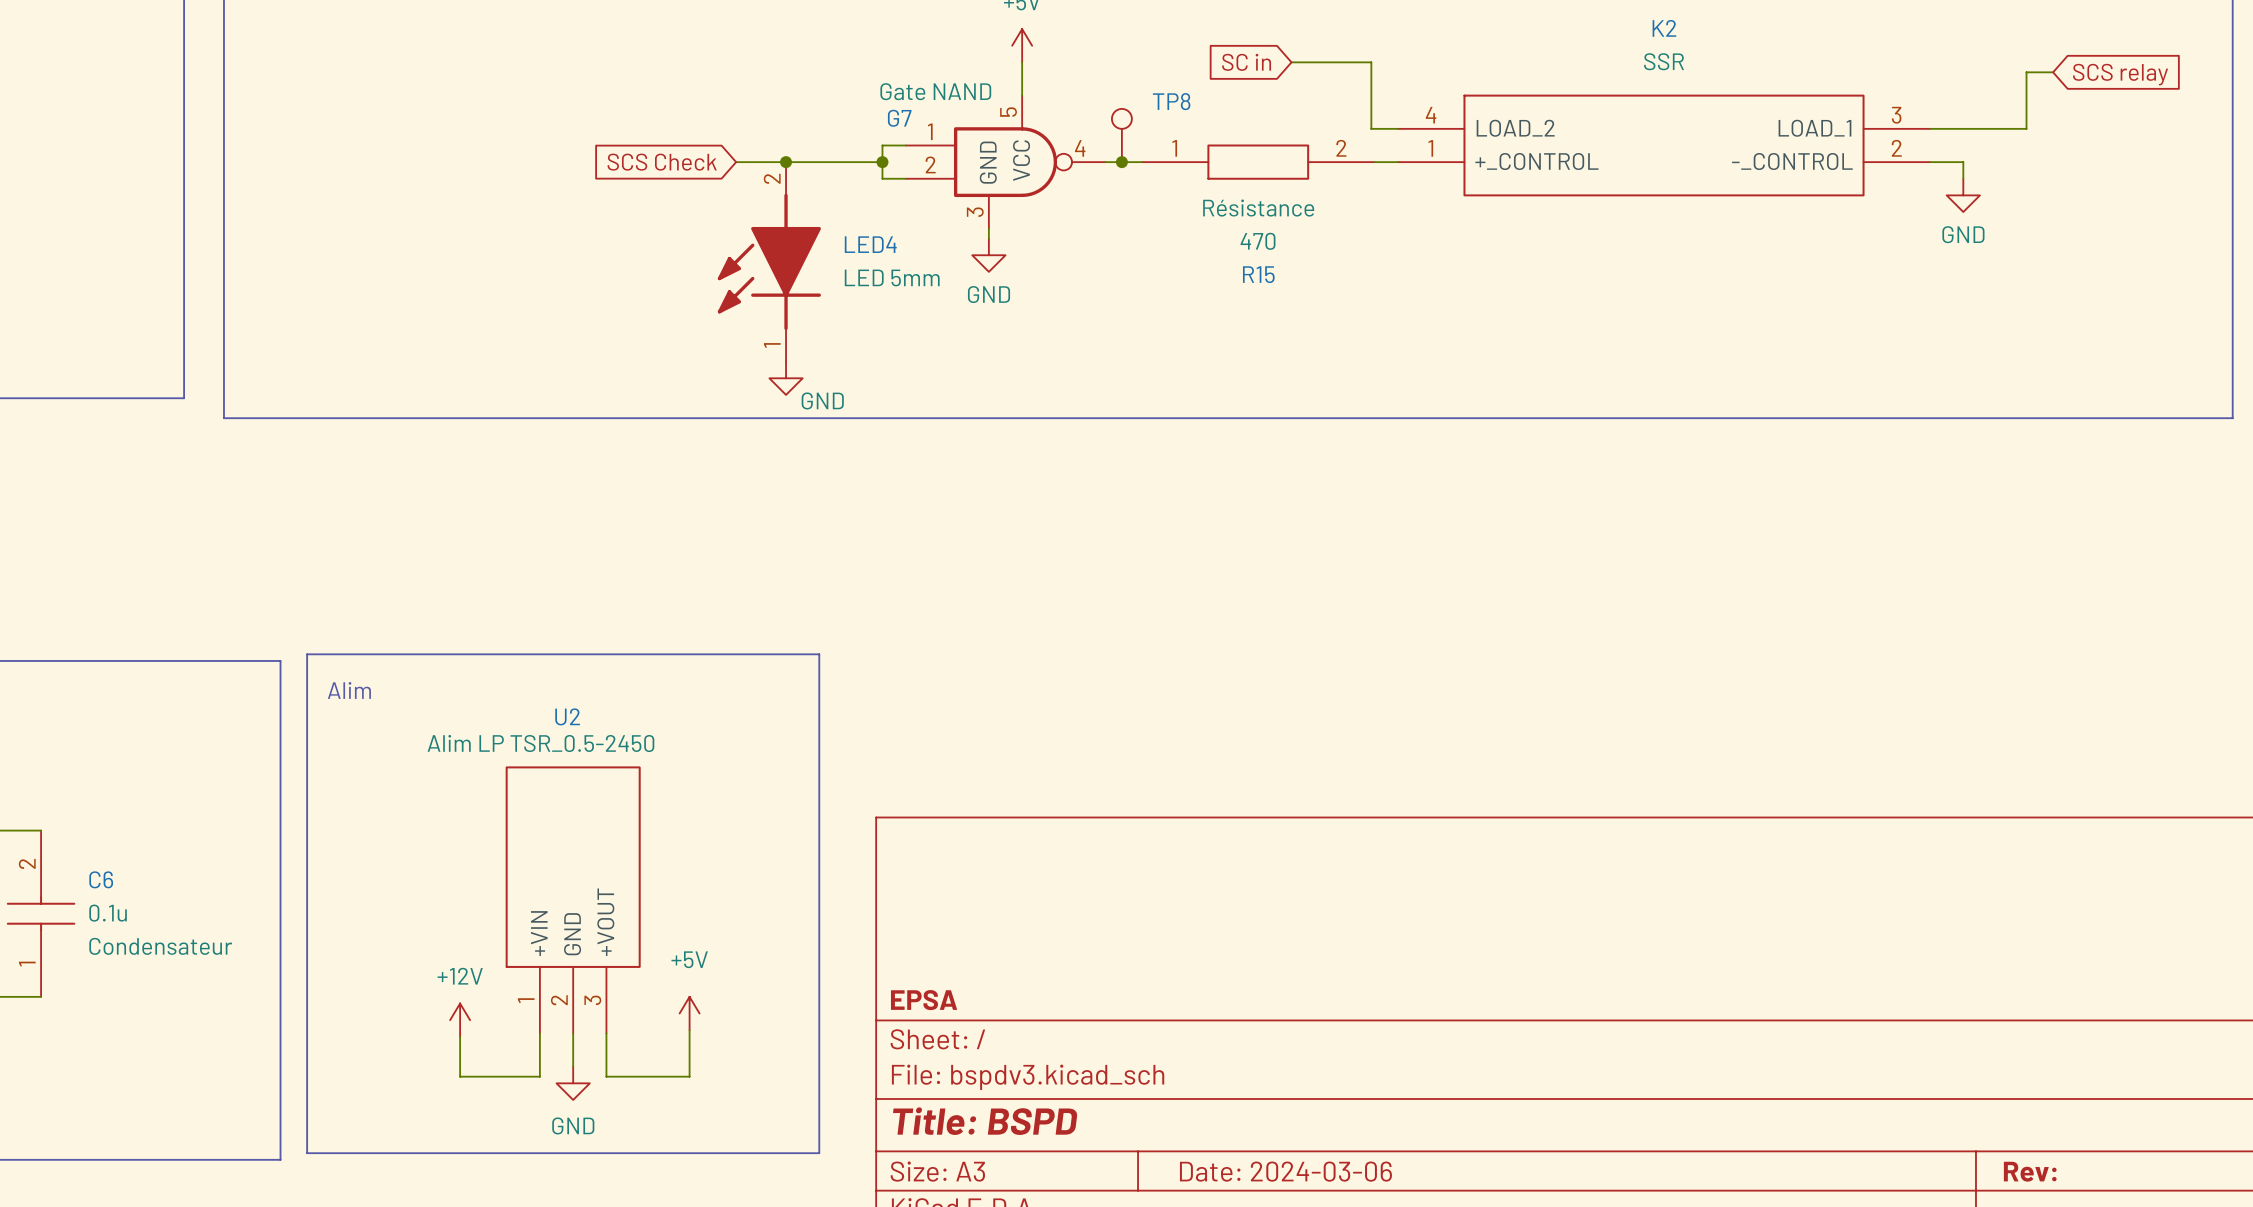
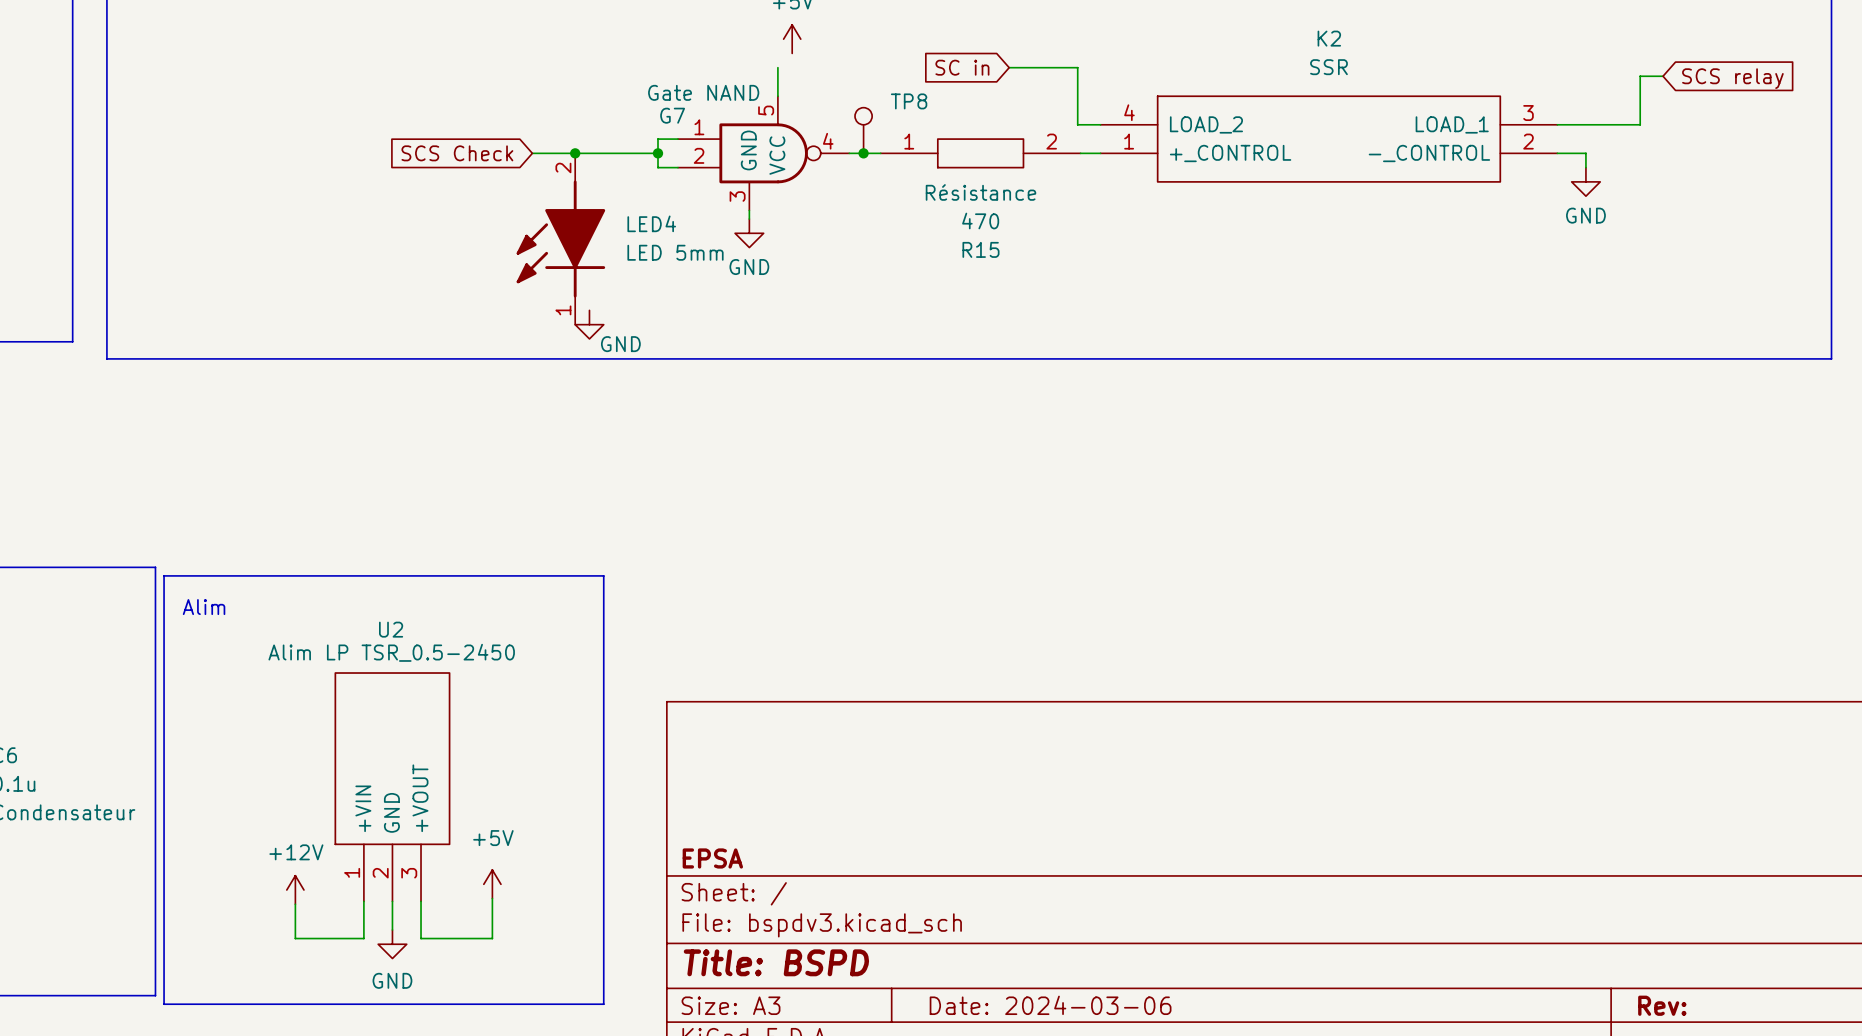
wire: (1022, 62) (1022, 95) -> (777, 67) (777, 96)
global label position: SC in (1246, 62) -> SC in (962, 67)
wire: (1291, 62) (1371, 62) (1371, 128) (1397, 128) -> (1009, 67) (1077, 67) (1077, 124) (1100, 124)
wire: (2053, 72) (2026, 72) (2026, 128) (1930, 128) -> (1663, 76) (1640, 76) (1640, 124) (1557, 124)
global label position: SCS relay (2120, 74) -> SCS relay (1732, 78)
TP8 position: (1121, 135) -> (863, 130)
wire: (905, 145) (882, 145) (882, 178) (905, 178) -> none
K2 position: (1664, 145) -> (1328, 139)
global label position: SCS Check (662, 162) -> SCS Check (457, 153)
wire: (736, 162) (865, 162) -> (677, 167) (657, 167) (657, 139)
junction position: (786, 162) -> (575, 153)
junction position: (882, 162) -> (657, 153)
G7 position: (1005, 162) -> (763, 153)
wire: (1105, 162) (1141, 162) -> (849, 153) (880, 153)
junction position: (1121, 162) -> (863, 153)
R15 position: (1258, 162) -> (980, 153)
wire: (1374, 162) (1397, 162) -> (1080, 153) (1100, 153)
wire: (1930, 162) (1963, 162) (1963, 178) -> (1557, 153) (1585, 153) (1585, 167)
wire: none -> (532, 153) (657, 153)
power symbol position: GND (1963, 195) -> GND (1585, 181)
wire: (988, 228) (988, 238) -> (749, 210) (749, 219)
power symbol position: GND (988, 255) -> GND (749, 233)
LED4 position: (769, 261) -> (560, 239)
line: (307, 654) (819, 654) (819, 1153) (307, 1153) (307, 654) -> (164, 575) (603, 575) (603, 1004) (164, 1004) (164, 575)
text position: Alim (349, 690) -> Alim (204, 607)
U2 position: (573, 899) -> (392, 786)
power symbol position: +5V (689, 1013) -> +5V (492, 884)
power symbol position: +12V (460, 1020) -> +12V (295, 890)
wire: (689, 1030) (689, 1076) (606, 1076) (606, 1033) -> (492, 898) (492, 938) (421, 938) (421, 901)
wire: (539, 1033) (539, 1076) (460, 1076) (460, 1036) -> (363, 901) (363, 938) (295, 938) (295, 904)
wire: (573, 1033) (573, 1066) -> (392, 901) (392, 929)
power symbol position: GND (573, 1083) -> GND (392, 944)

